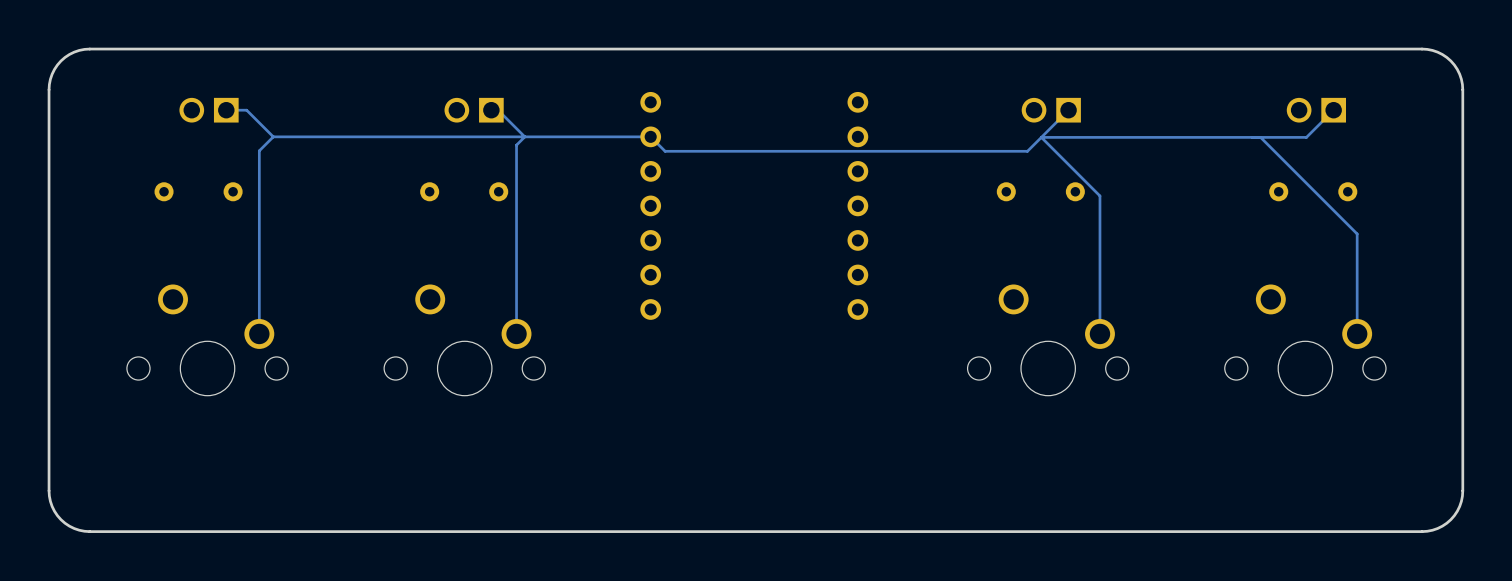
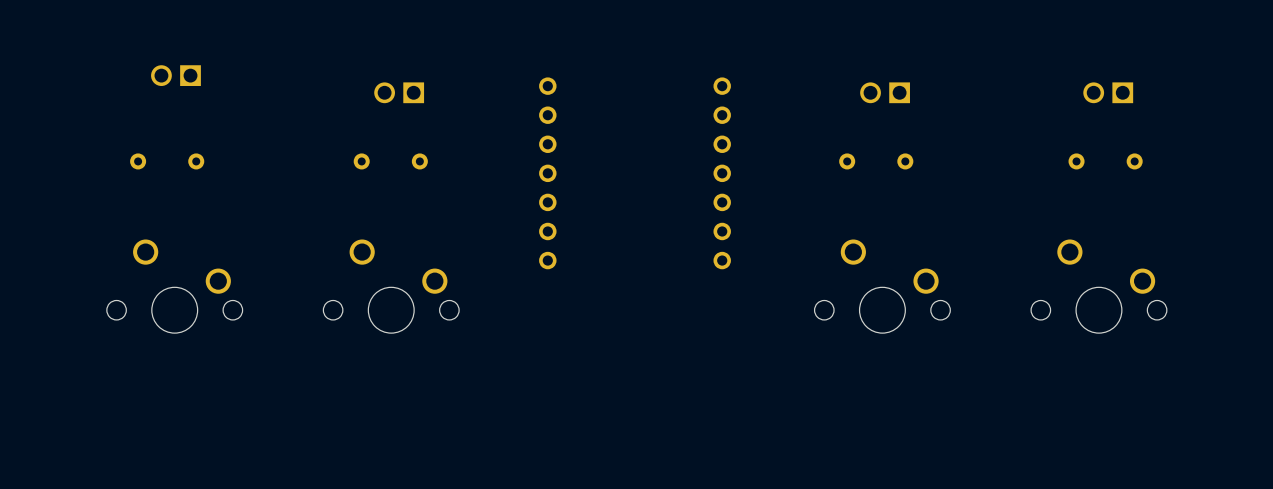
board edge: (1422, 49) (79, 50) (69, 54) (57, 64) (52, 74) (49, 89) (50, 501) (57, 515) (64, 523) (79, 530) (89, 531) (1432, 530) (1442, 526) (1454, 515) (1462, 496) (1462, 89) (1459, 74) (1450, 60) (1437, 52) (1422, 49) -> none
track: (491, 103) (524, 136) (516, 145) (516, 333) -> none
part position: (209, 110) -> (175, 75)
track: (226, 110) (246, 110) (273, 136) -> none
track: (1068, 110) (1027, 151) (665, 151) (650, 136) (273, 136) -> none
track: (1333, 110) (1306, 137) (1041, 137) (1099, 195) (1099, 333) -> none
track: (273, 136) (259, 150) (259, 333) -> none
track: (1260, 137) (1357, 233) (1357, 333) -> none

